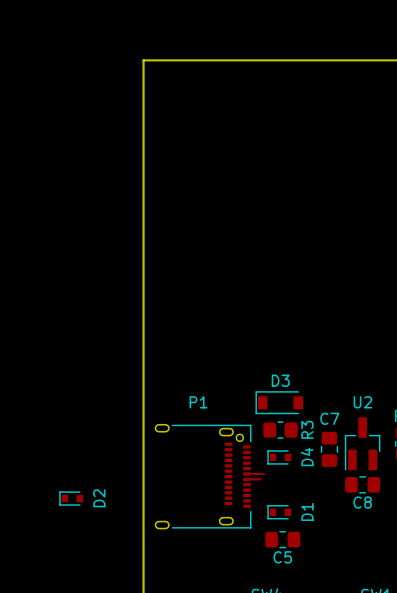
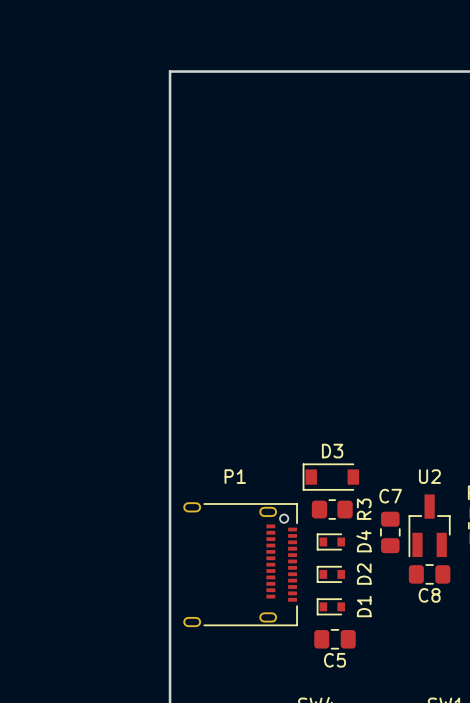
track: (246, 473) (263, 473) -> none
track: (246, 479) (261, 479) -> none
D2 position: (71, 498) -> (330, 574)

